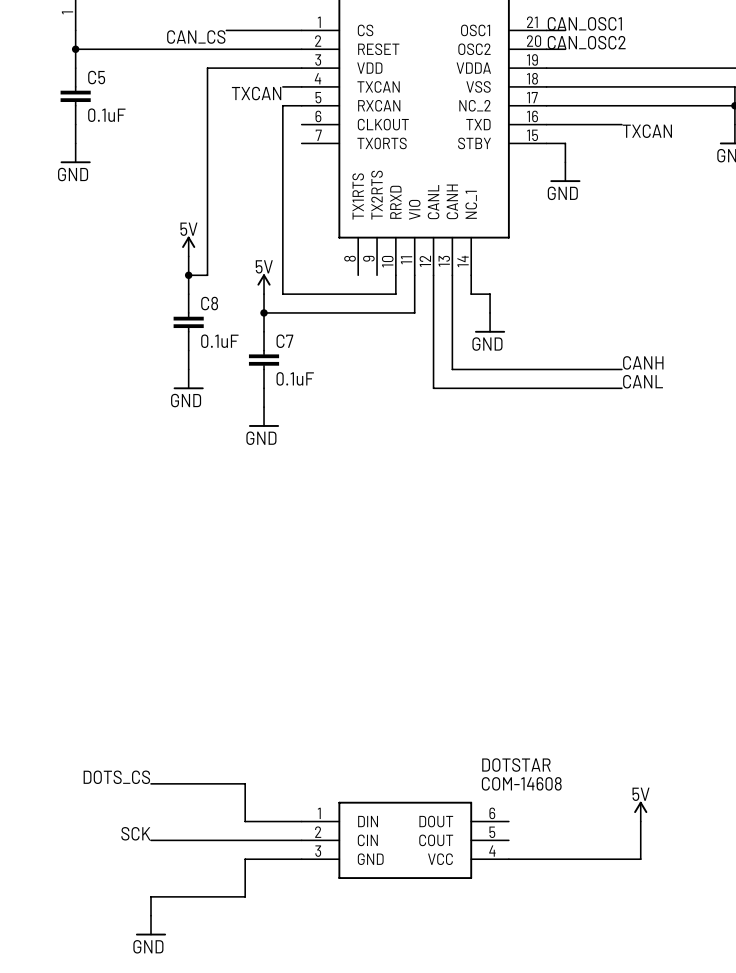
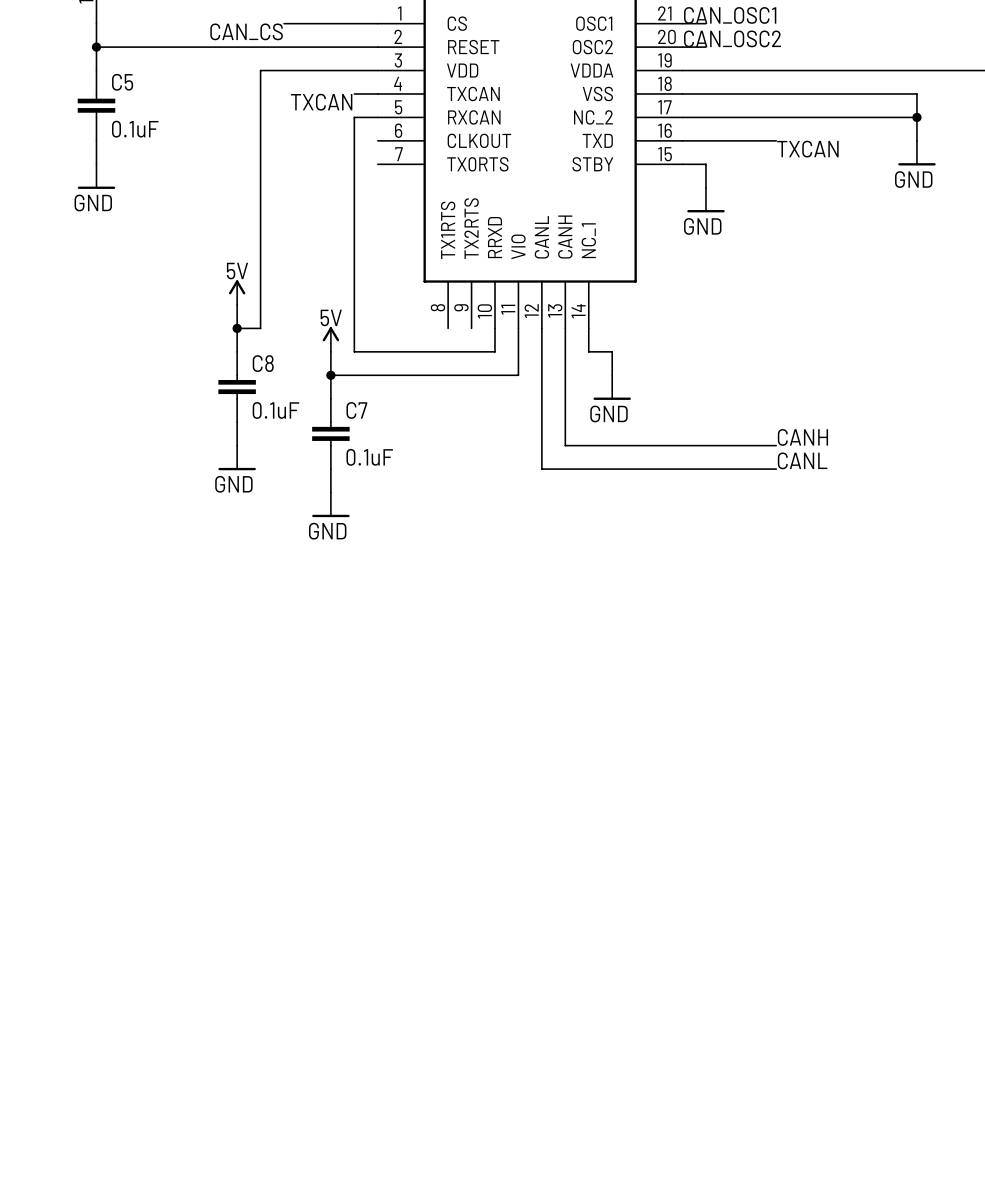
label: DOTS_CS (116, 777) -> none
wire: (151, 783) (245, 783) (245, 821) (301, 821) -> none
power symbol: 5V (640, 811) -> none
wire: (640, 821) (640, 859) (508, 859) -> none
label: SCK (135, 833) -> none
wire: (151, 840) (301, 840) -> none
DOTSTAR: COM-14608 (405, 840) -> none
wire: (301, 859) (245, 859) (245, 896) (151, 896) (151, 915) -> none
power symbol: GND (151, 925) -> none

